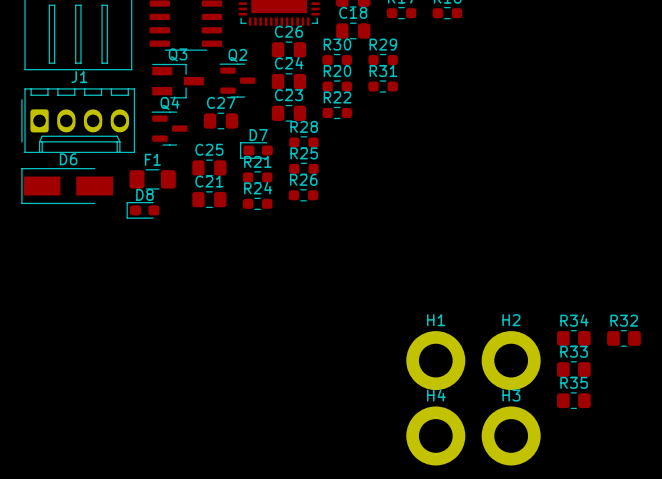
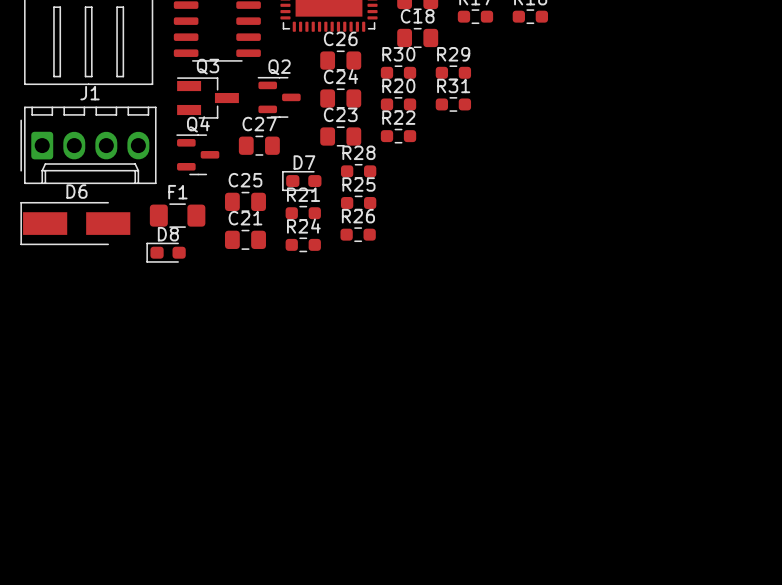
R34: (573, 338) -> none
R32: (623, 338) -> none
H1: (435, 360) -> none
H2: (511, 360) -> none
R33: (573, 369) -> none
R35: (573, 400) -> none
H4: (435, 435) -> none
H3: (511, 435) -> none

